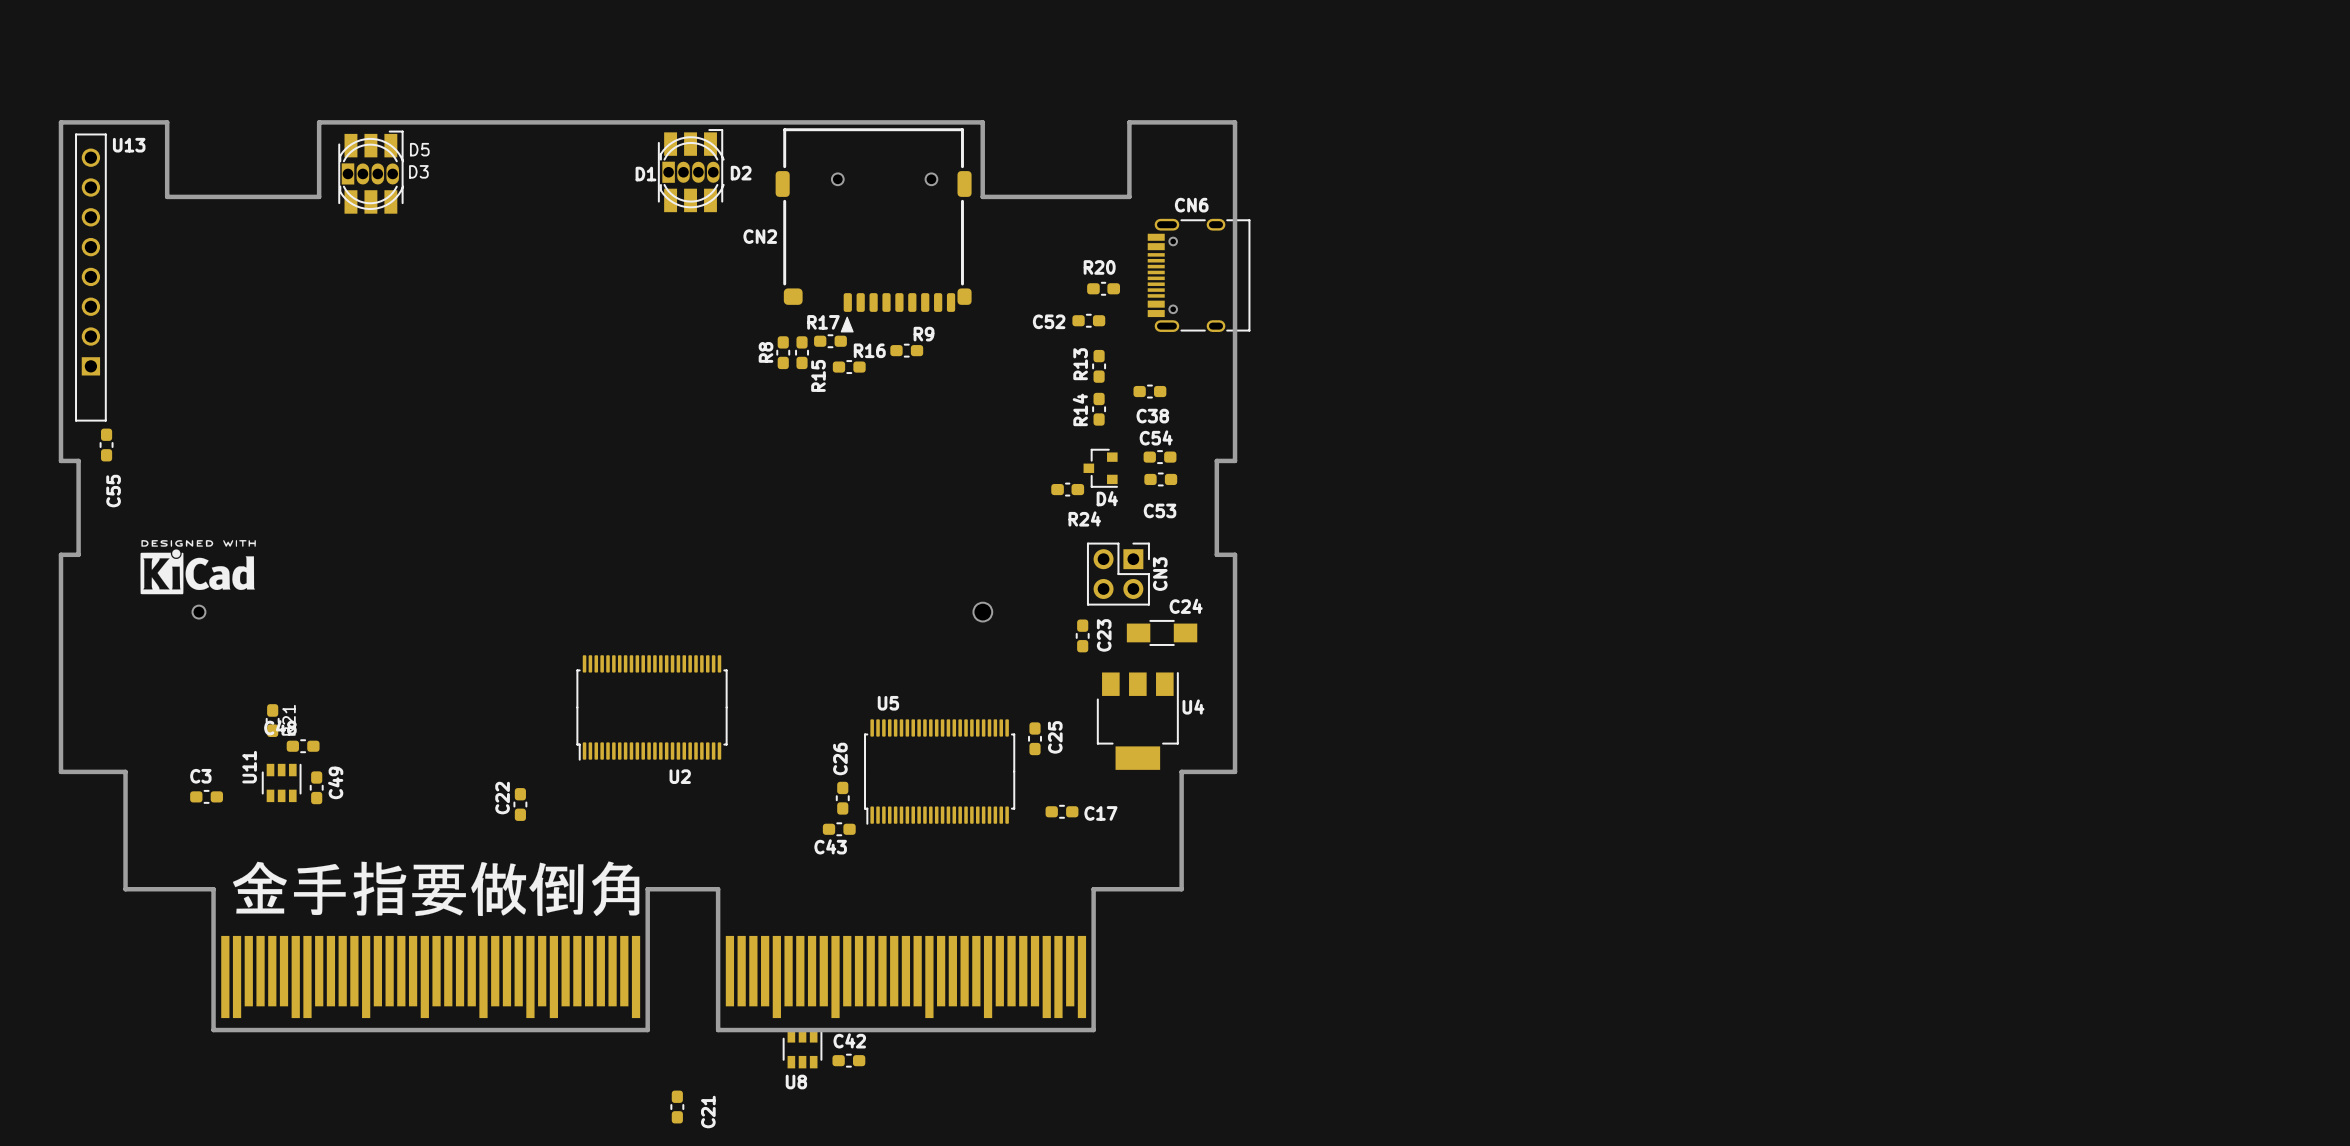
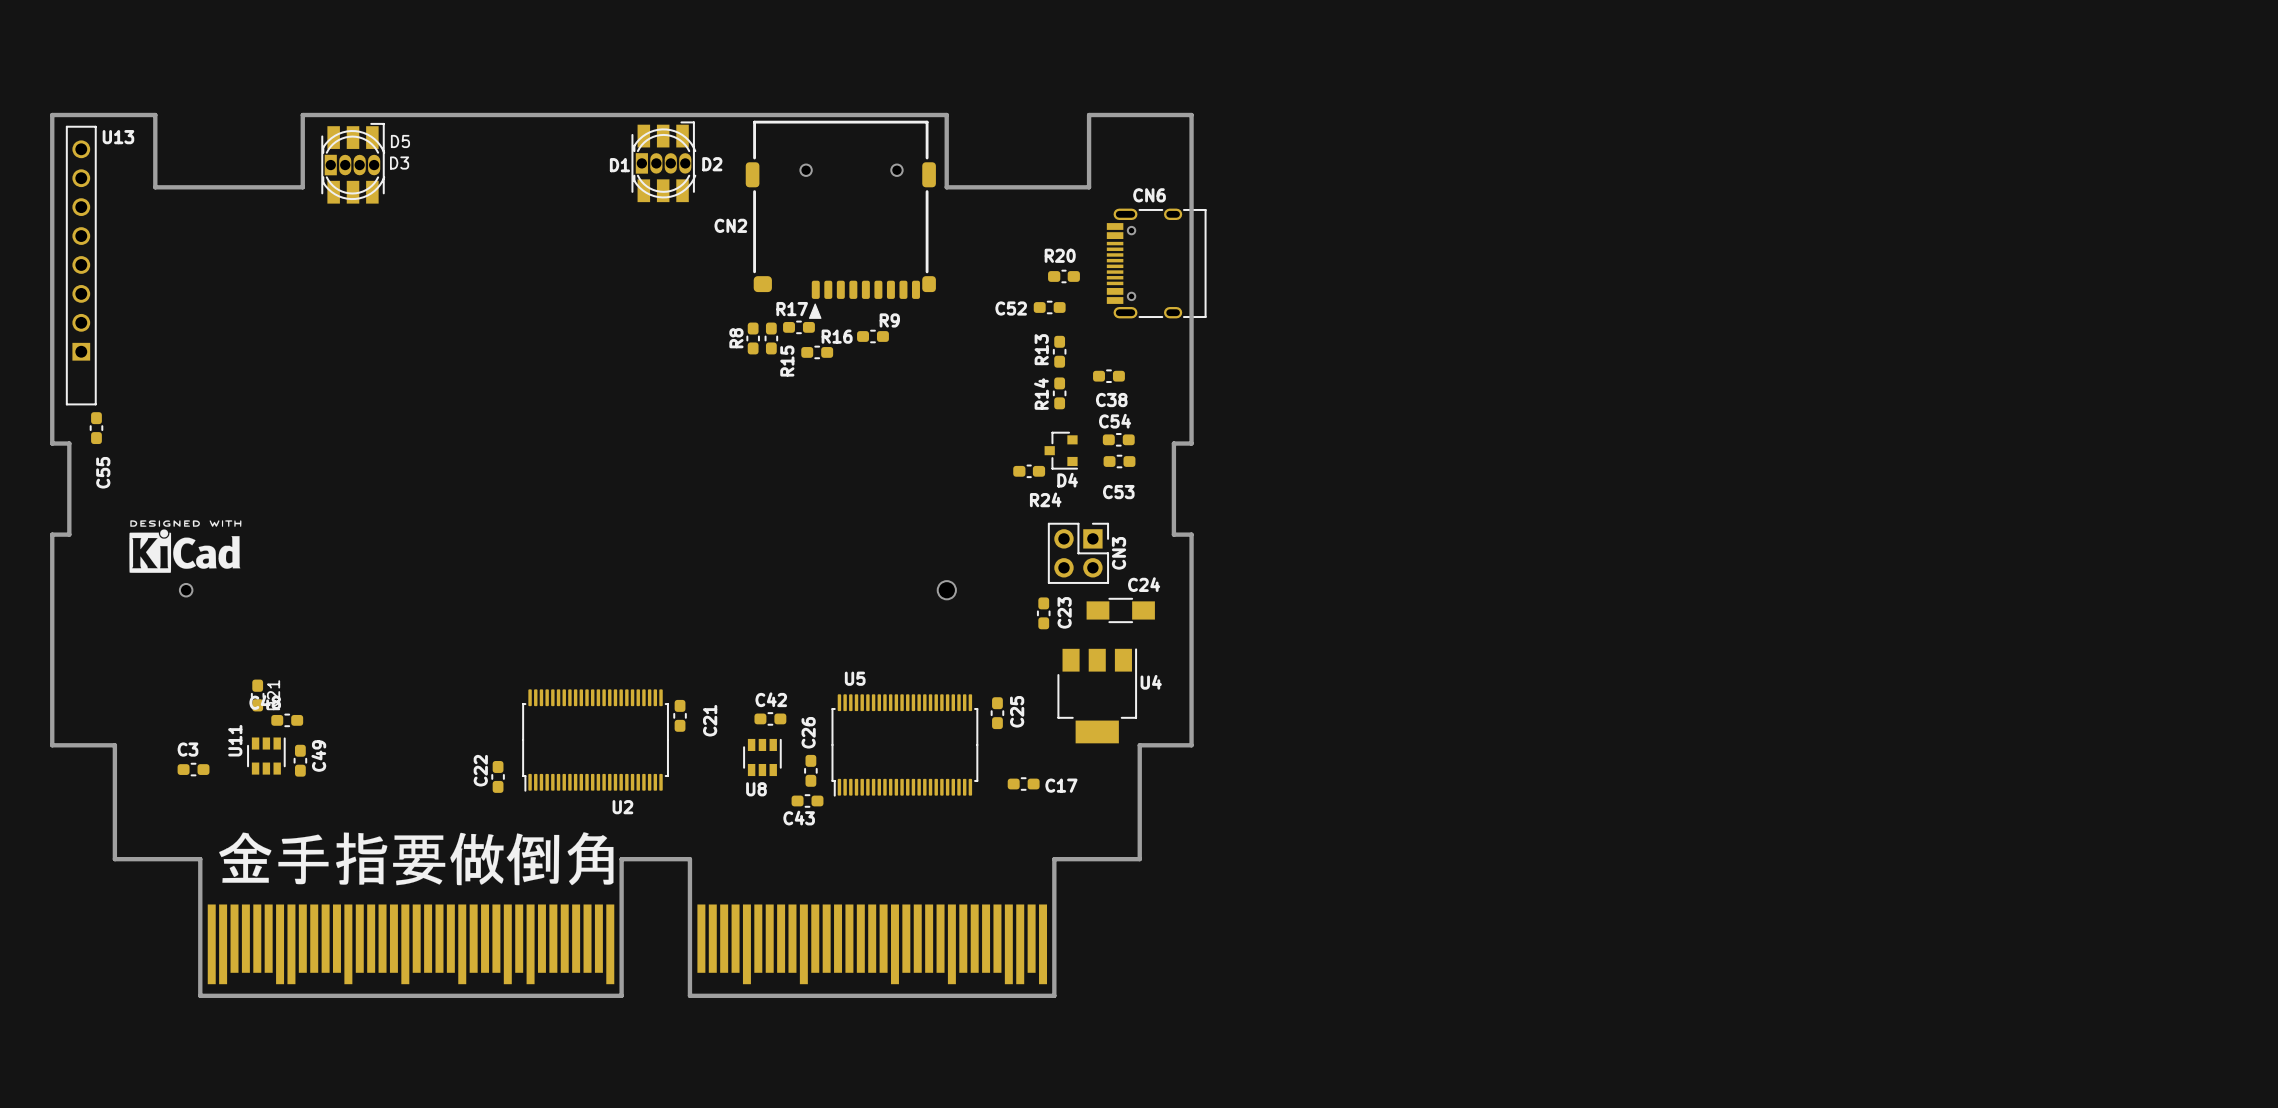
U2 position: (652, 707) -> (595, 740)
U8 position: (802, 1049) -> (762, 757)
C42 position: (848, 1060) -> (770, 718)
C21 position: (677, 1107) -> (680, 715)

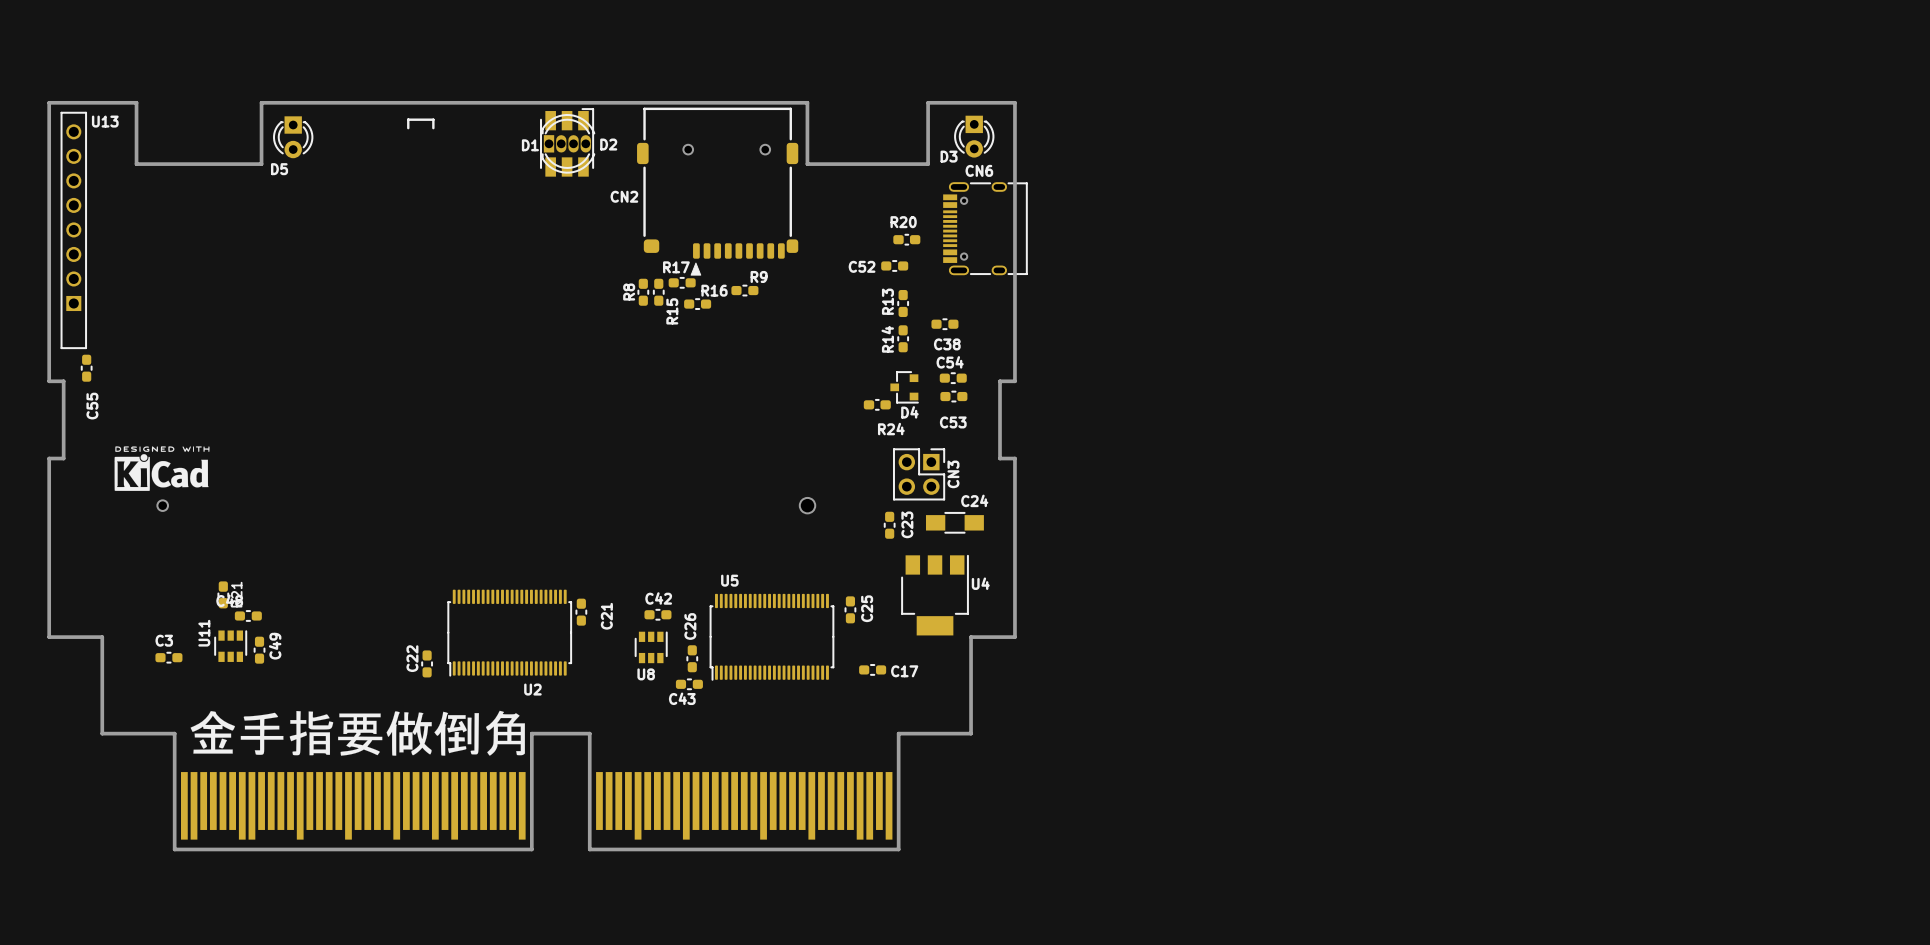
D3 footprint: [321, 123, 385, 204] -> [954, 115, 995, 158]
D5 footprint: [322, 130, 385, 200] -> [273, 116, 313, 159]
line: none -> (408, 119) (408, 128)
line: none -> (408, 119) (433, 119) (433, 128)
D5 name position: D5 (400, 141) -> D5 (279, 169)
D3 name position: D3 (399, 163) -> D3 (949, 156)

